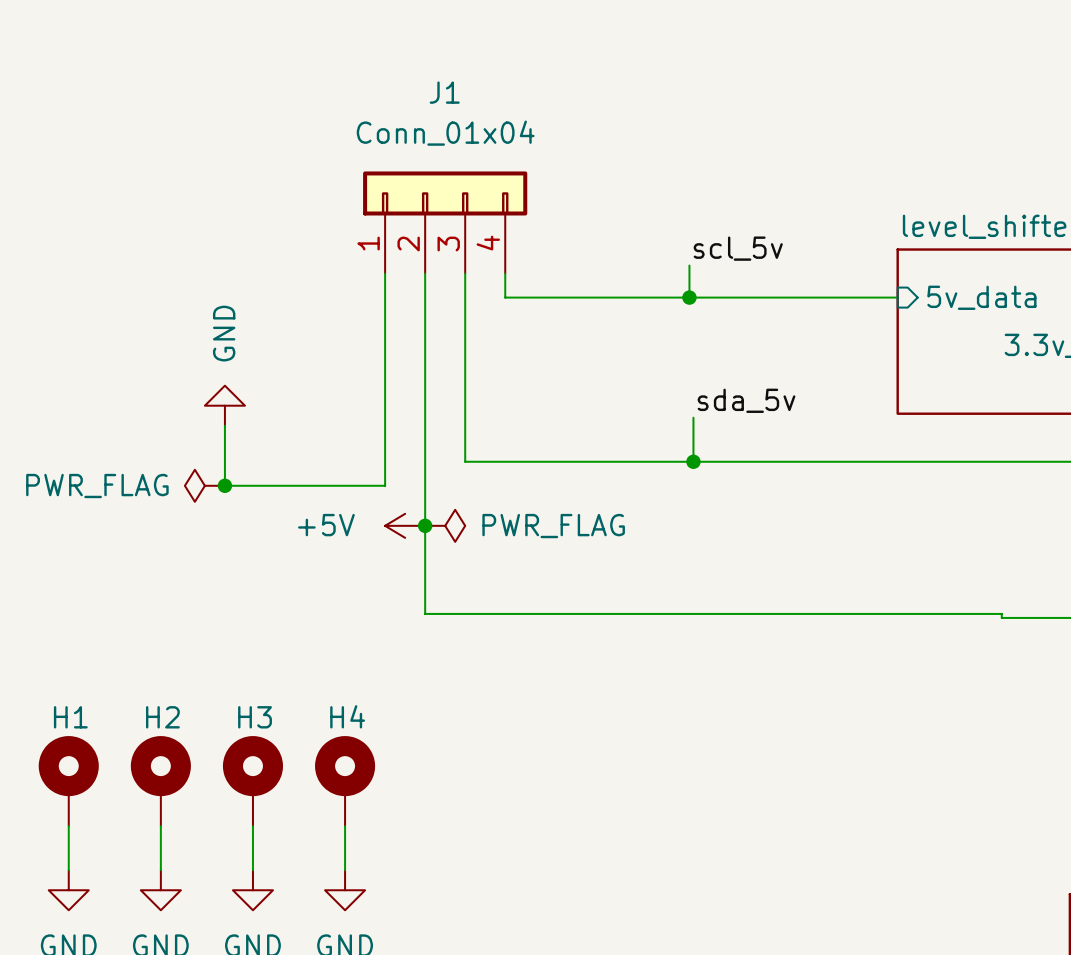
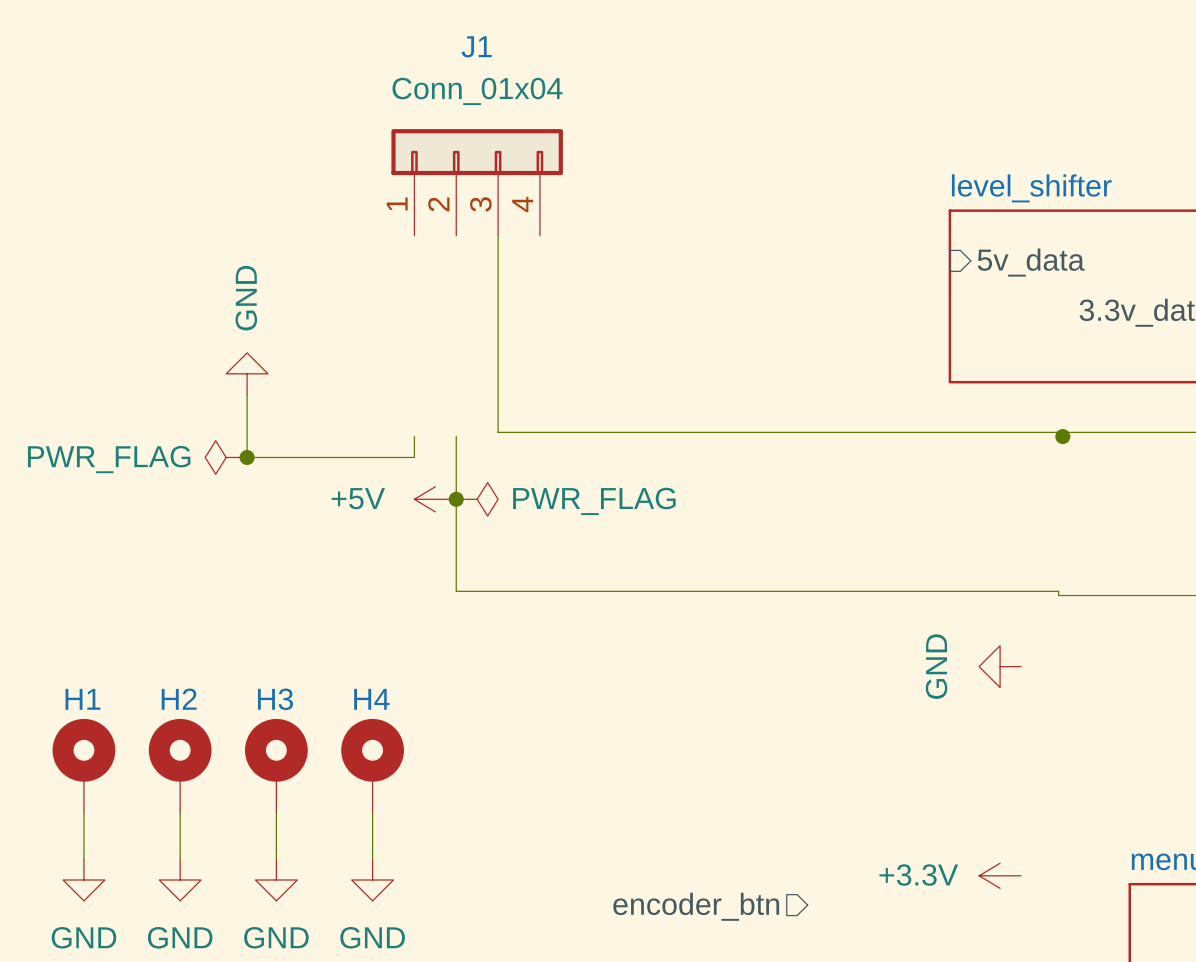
label: scl_5v (738, 248) -> none
wire: (689, 265) (689, 297) -> none
wire: (385, 273) (385, 465) -> none
wire: (425, 273) (425, 465) -> none
wire: (505, 273) (505, 297) (897, 297) -> none
junction: (689, 297) -> none
label: sda_5v (746, 400) -> none
wire: (693, 417) (693, 461) -> none
junction: (693, 461) -> none
junction: none -> (1062, 436)
power symbol: none -> GND (1000, 666)
power symbol: none -> +3.3V (1000, 875)
sheet pin: none -> encoder_btn (696, 906)

